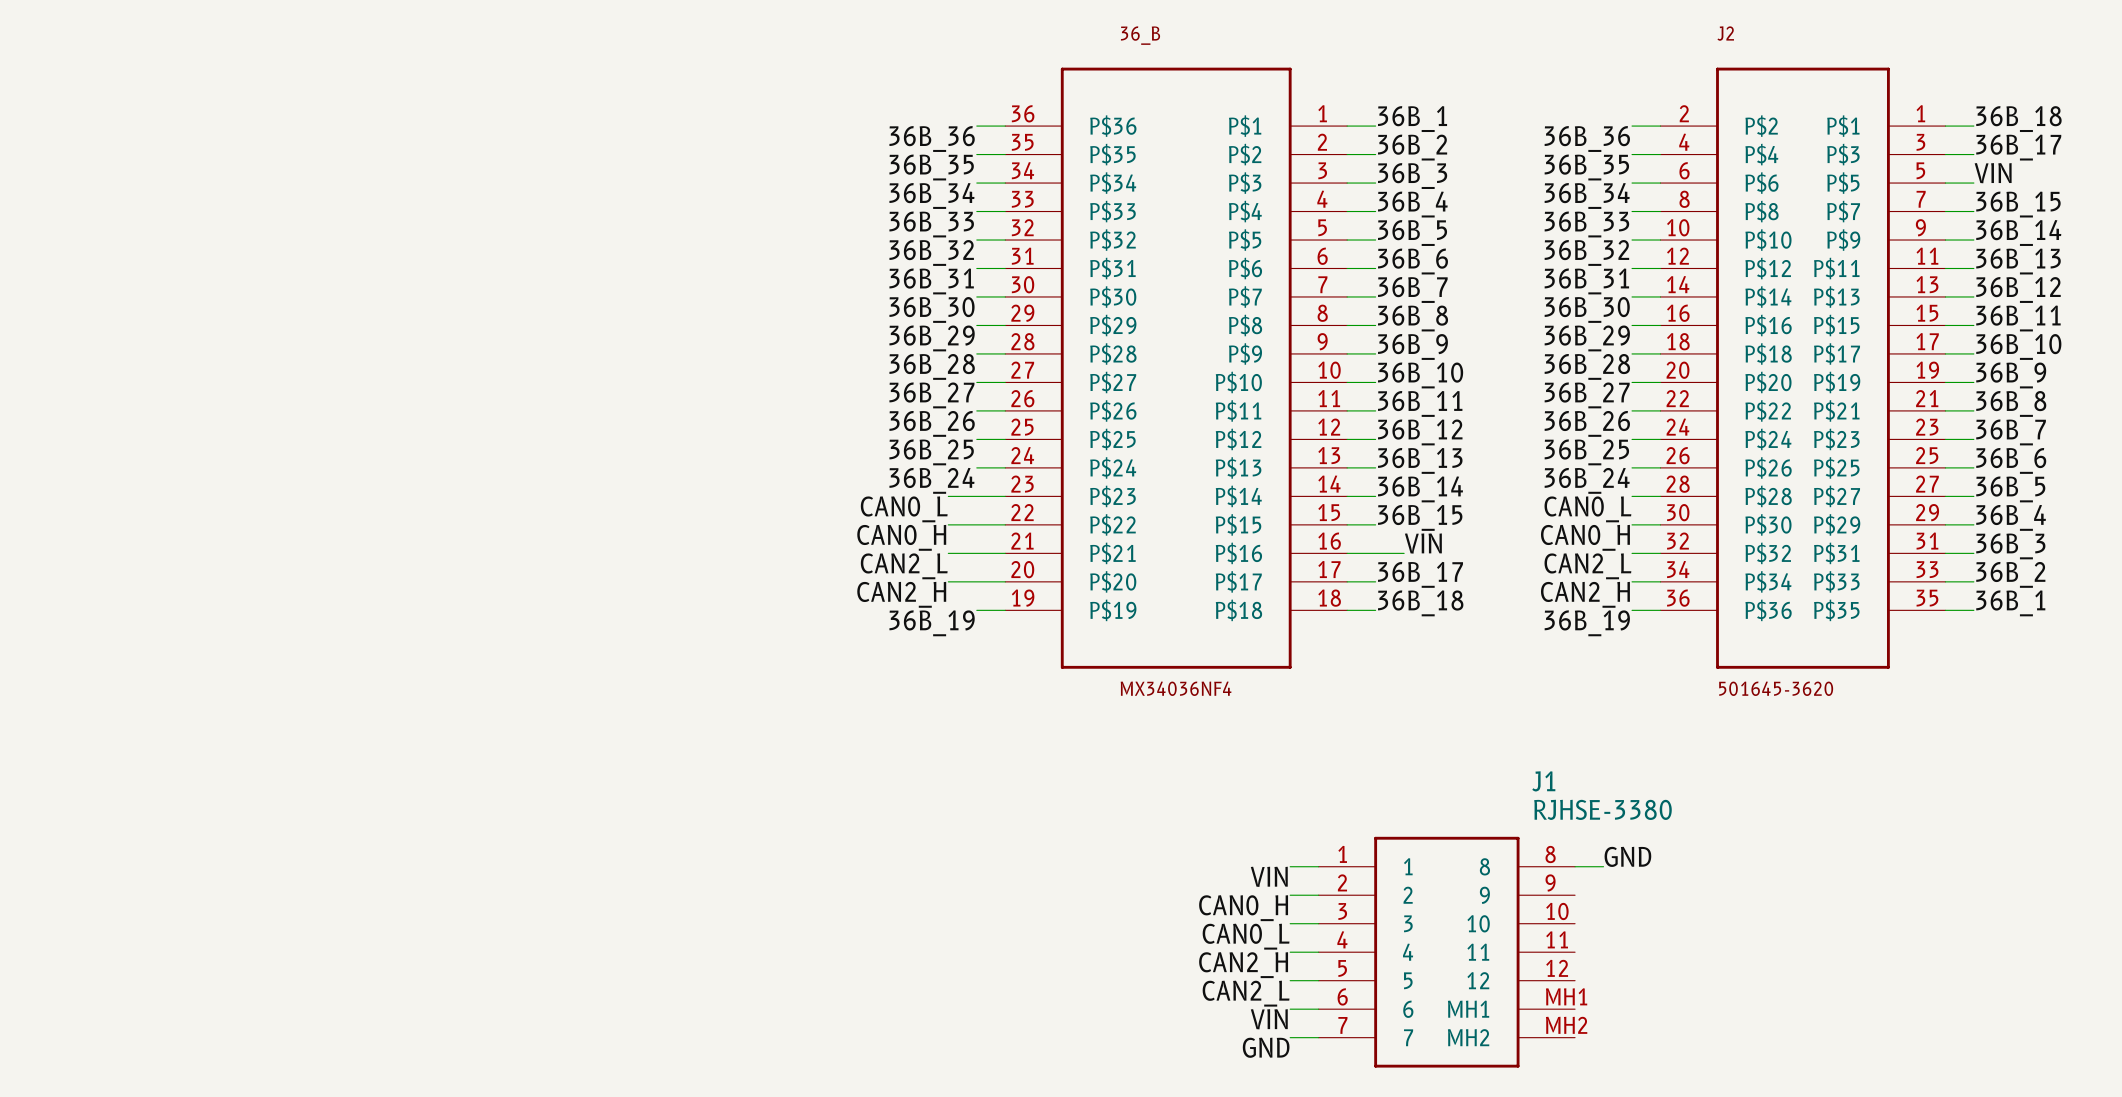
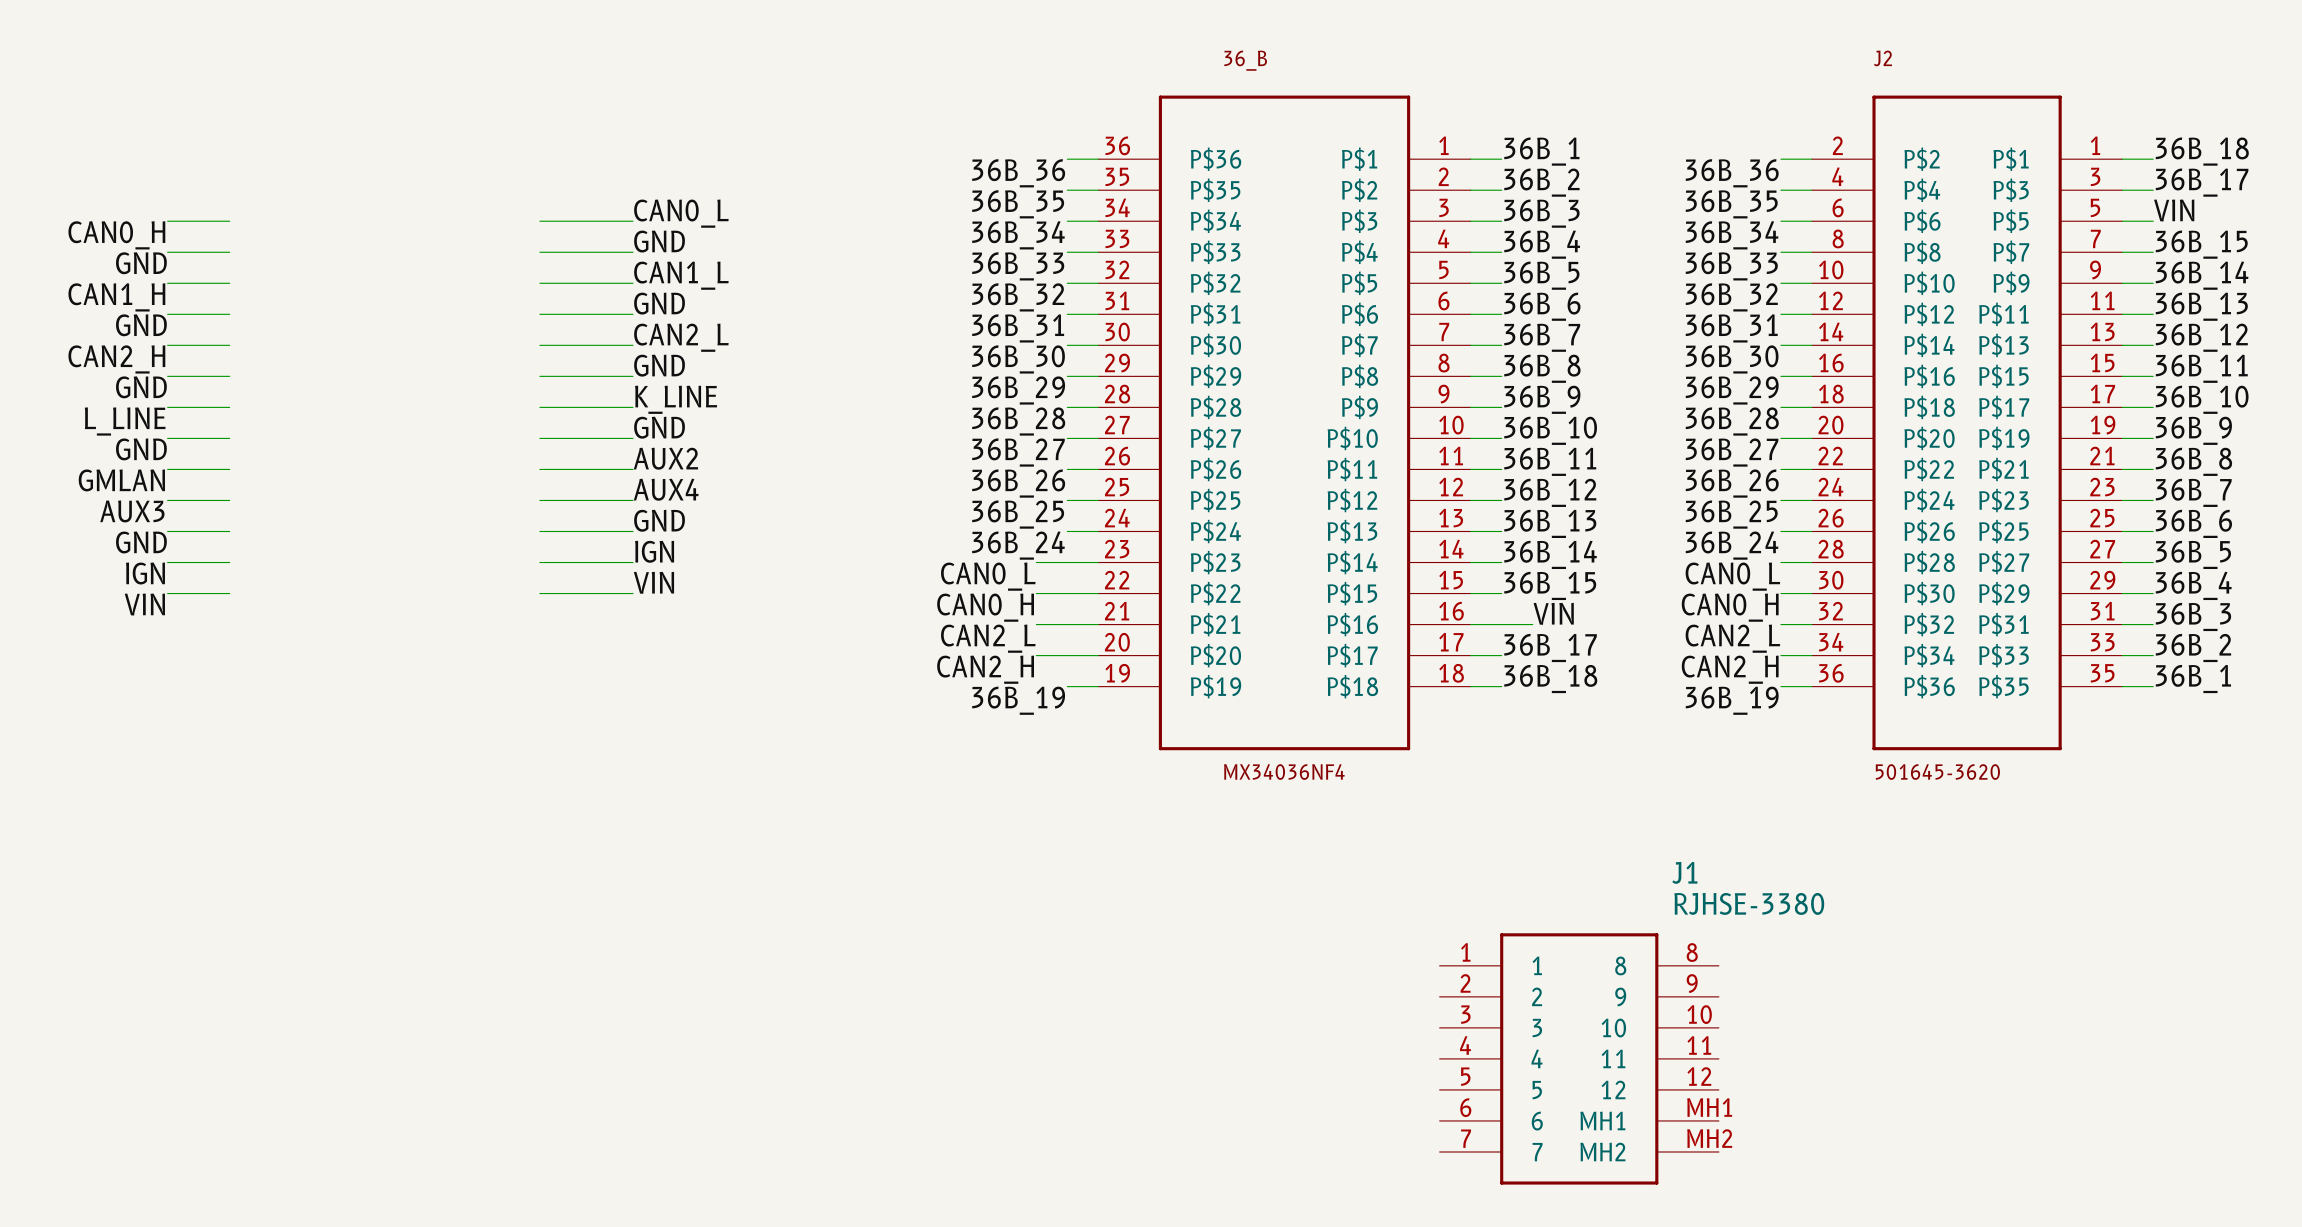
label: none -> CAN0_L (681, 213)
wire: none -> (167, 221) (229, 221)
wire: none -> (539, 221) (632, 221)
label: none -> CAN0_H (116, 235)
label: none -> GND (659, 241)
wire: none -> (167, 252) (229, 252)
wire: none -> (539, 252) (632, 252)
label: none -> GND (141, 263)
label: none -> CAN1_L (681, 275)
wire: none -> (167, 283) (229, 283)
wire: none -> (539, 283) (632, 283)
label: none -> CAN1_H (116, 297)
label: none -> GND (659, 303)
wire: none -> (167, 314) (229, 314)
wire: none -> (539, 314) (632, 314)
label: none -> GND (141, 325)
label: none -> CAN2_L (681, 337)
wire: none -> (167, 345) (229, 345)
wire: none -> (539, 345) (632, 345)
label: none -> CAN2_H (116, 359)
label: none -> GND (659, 365)
wire: none -> (167, 376) (229, 376)
wire: none -> (539, 376) (632, 376)
label: none -> GND (141, 387)
label: none -> K_LINE (676, 399)
wire: none -> (167, 407) (229, 407)
wire: none -> (539, 407) (632, 407)
label: none -> L_LINE (125, 421)
label: none -> GND (659, 427)
wire: none -> (167, 438) (229, 438)
wire: none -> (539, 438) (632, 438)
label: none -> GND (141, 449)
label: none -> AUX2 (665, 458)
wire: none -> (167, 469) (229, 469)
wire: none -> (539, 469) (632, 469)
label: none -> GMLAN (121, 480)
label: none -> AUX4 (666, 489)
wire: none -> (167, 500) (229, 500)
wire: none -> (539, 500) (632, 500)
label: none -> AUX3 (132, 511)
label: none -> GND (659, 520)
wire: none -> (167, 531) (229, 531)
wire: none -> (539, 531) (632, 531)
label: none -> GND (141, 542)
label: none -> IGN (654, 551)
wire: none -> (167, 562) (229, 562)
wire: none -> (539, 562) (632, 562)
label: none -> IGN (145, 573)
label: none -> VIN (653, 582)
wire: none -> (167, 593) (229, 593)
wire: none -> (539, 593) (632, 593)
label: none -> VIN (144, 604)
label: GND (1627, 856) -> none
wire: (1290, 866) (1318, 866) -> none
wire: (1575, 866) (1603, 866) -> none
label: VIN (1269, 876) -> none
wire: (1290, 895) (1318, 895) -> none
label: CAN0_H (1243, 908) -> none
wire: (1290, 923) (1318, 923) -> none
label: CAN0_L (1246, 936) -> none
wire: (1290, 952) (1318, 952) -> none
label: CAN2_H (1243, 965) -> none
wire: (1290, 980) (1318, 980) -> none
label: CAN2_L (1246, 993) -> none
wire: (1290, 1009) (1318, 1009) -> none
label: VIN (1269, 1019) -> none
wire: (1290, 1037) (1318, 1037) -> none
label: GND (1266, 1047) -> none

